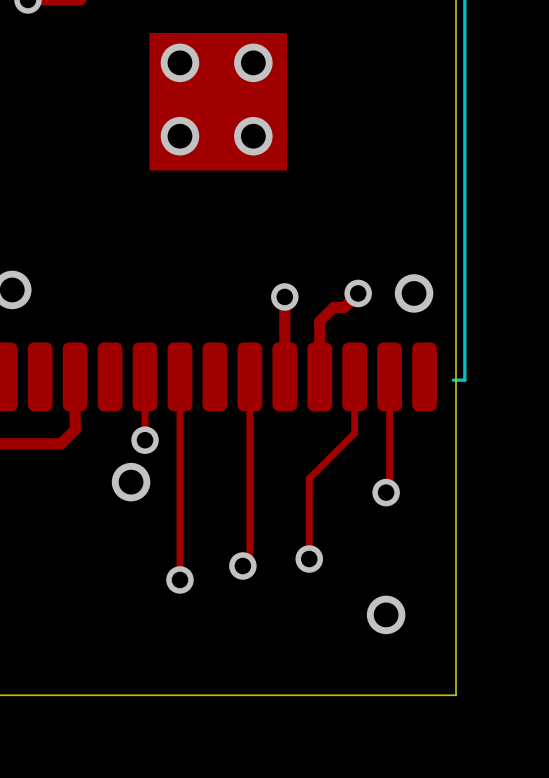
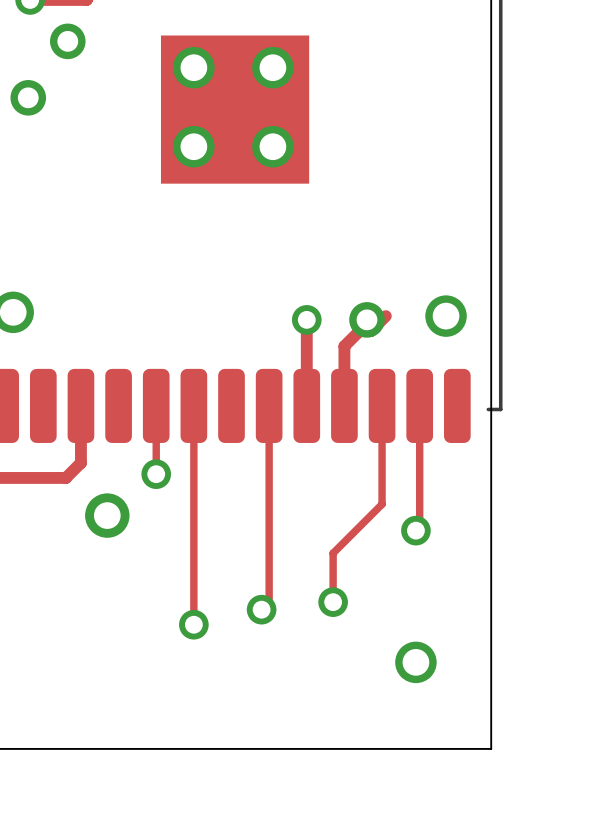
via: none -> (67, 41)
via: none -> (28, 97)
via position: (358, 293) -> (367, 319)
track: (354, 433) (309, 478) (309, 513) -> (382, 466) (382, 504) (333, 553)
via: none -> (107, 515)
via: (131, 482) -> none

